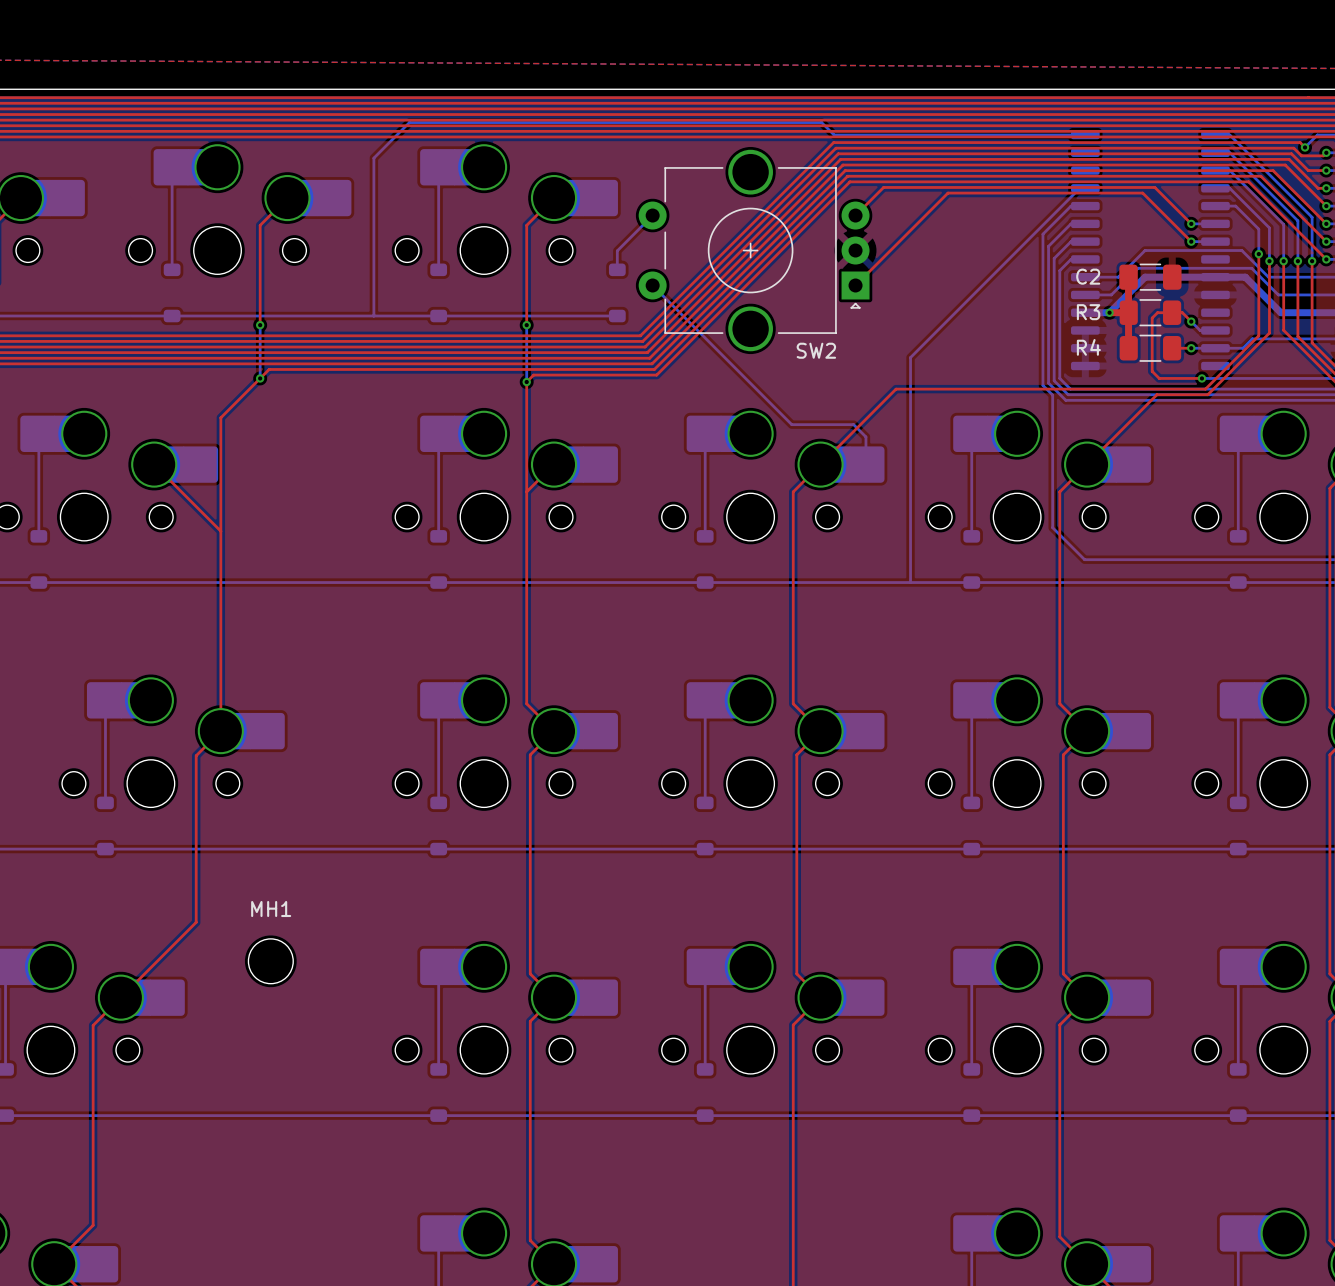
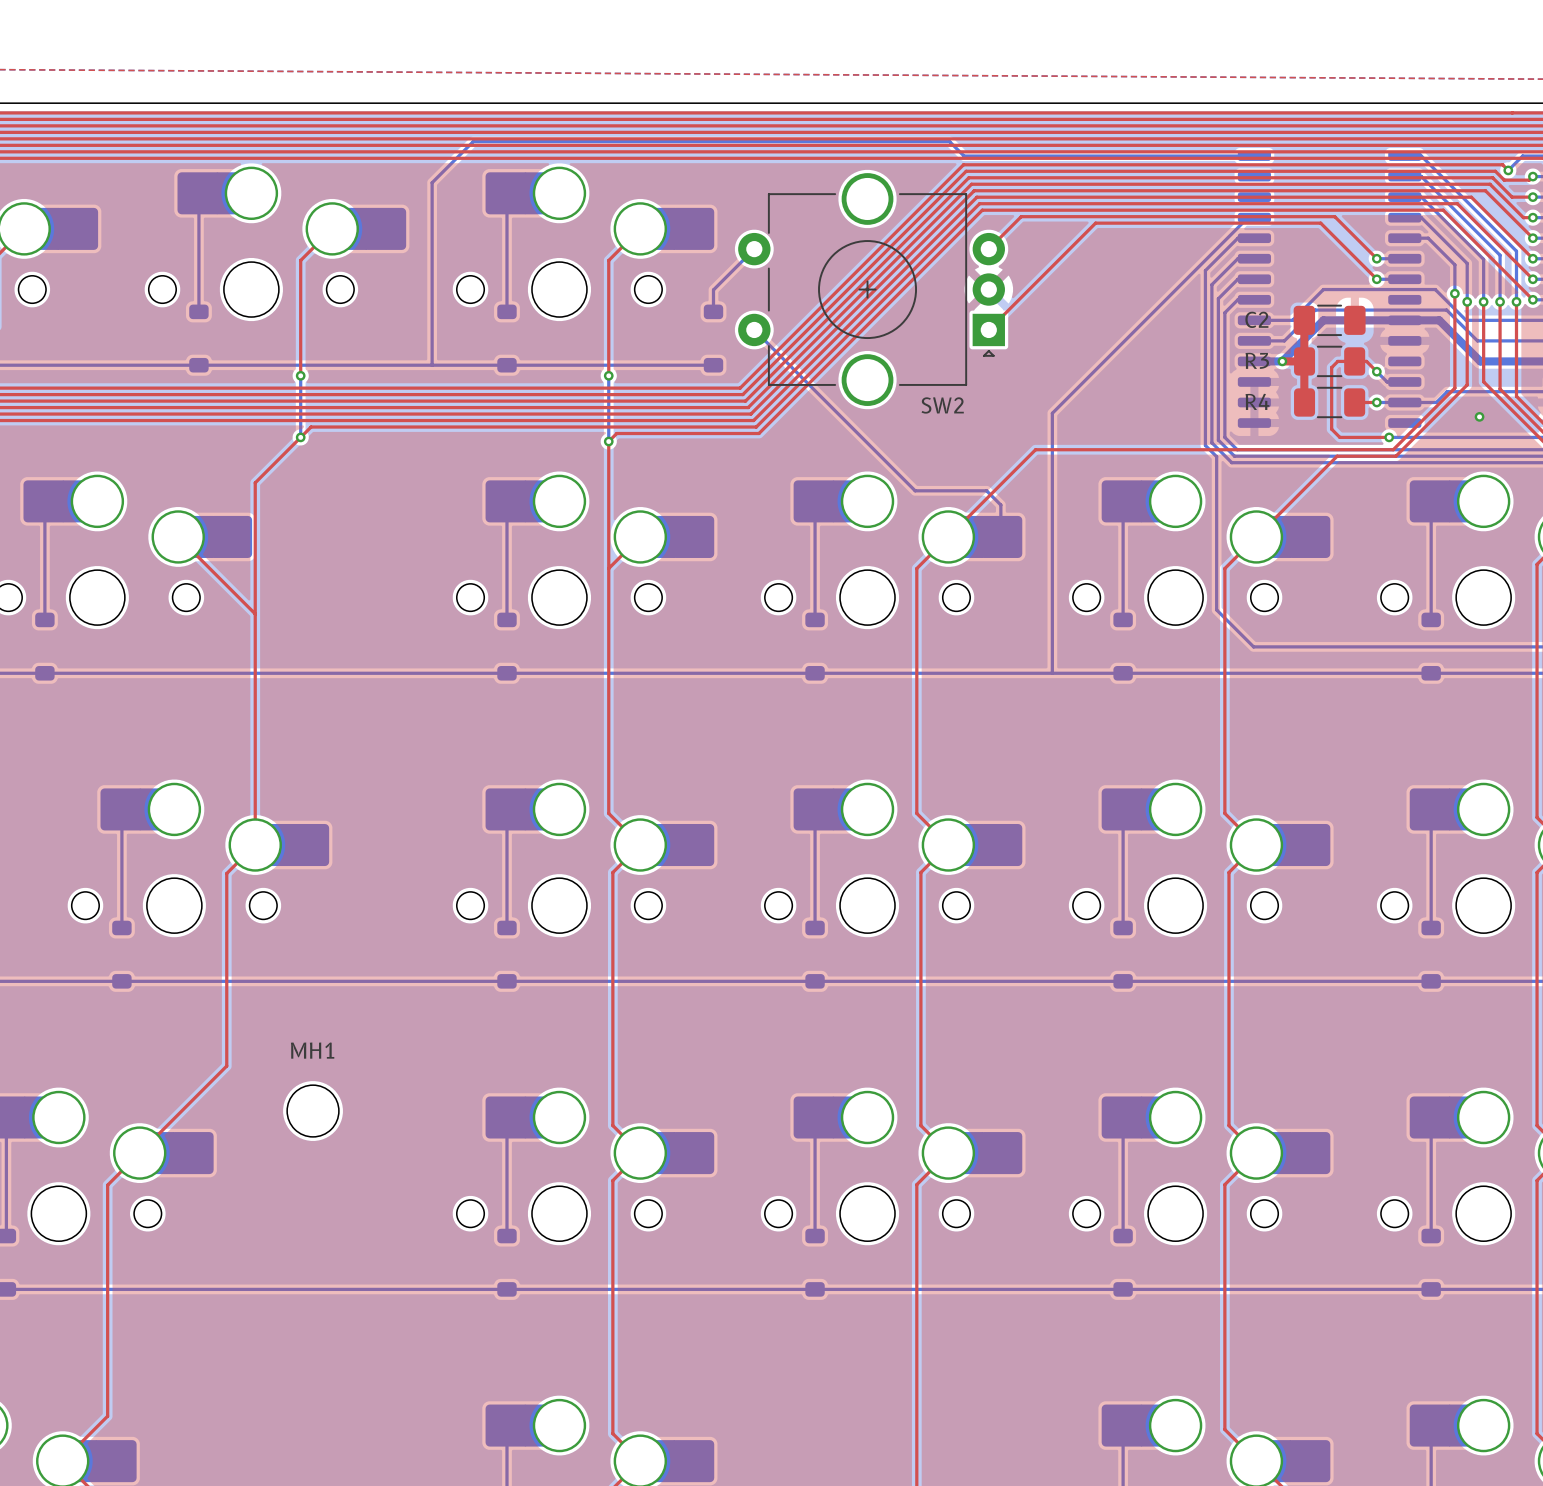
via: none -> (1479, 416)

